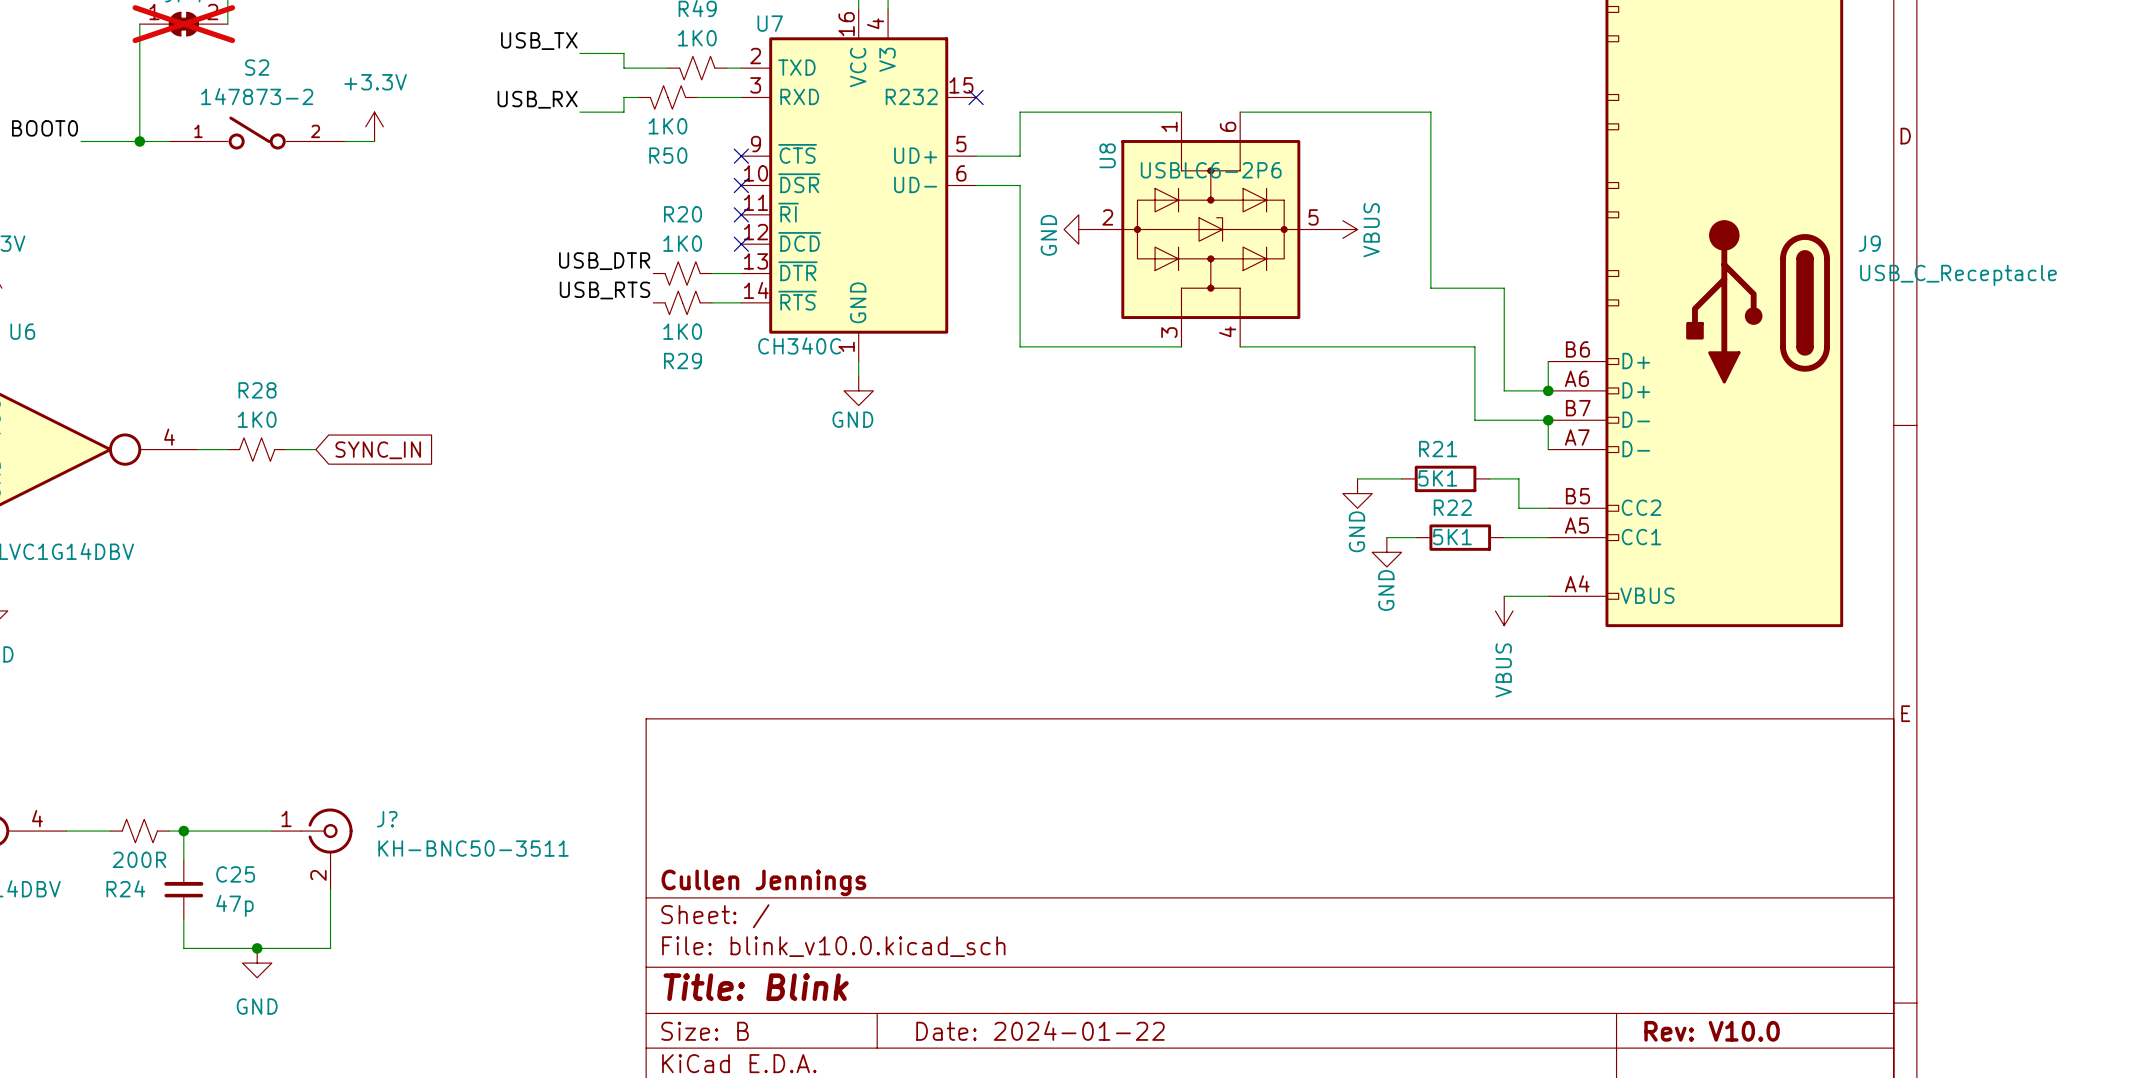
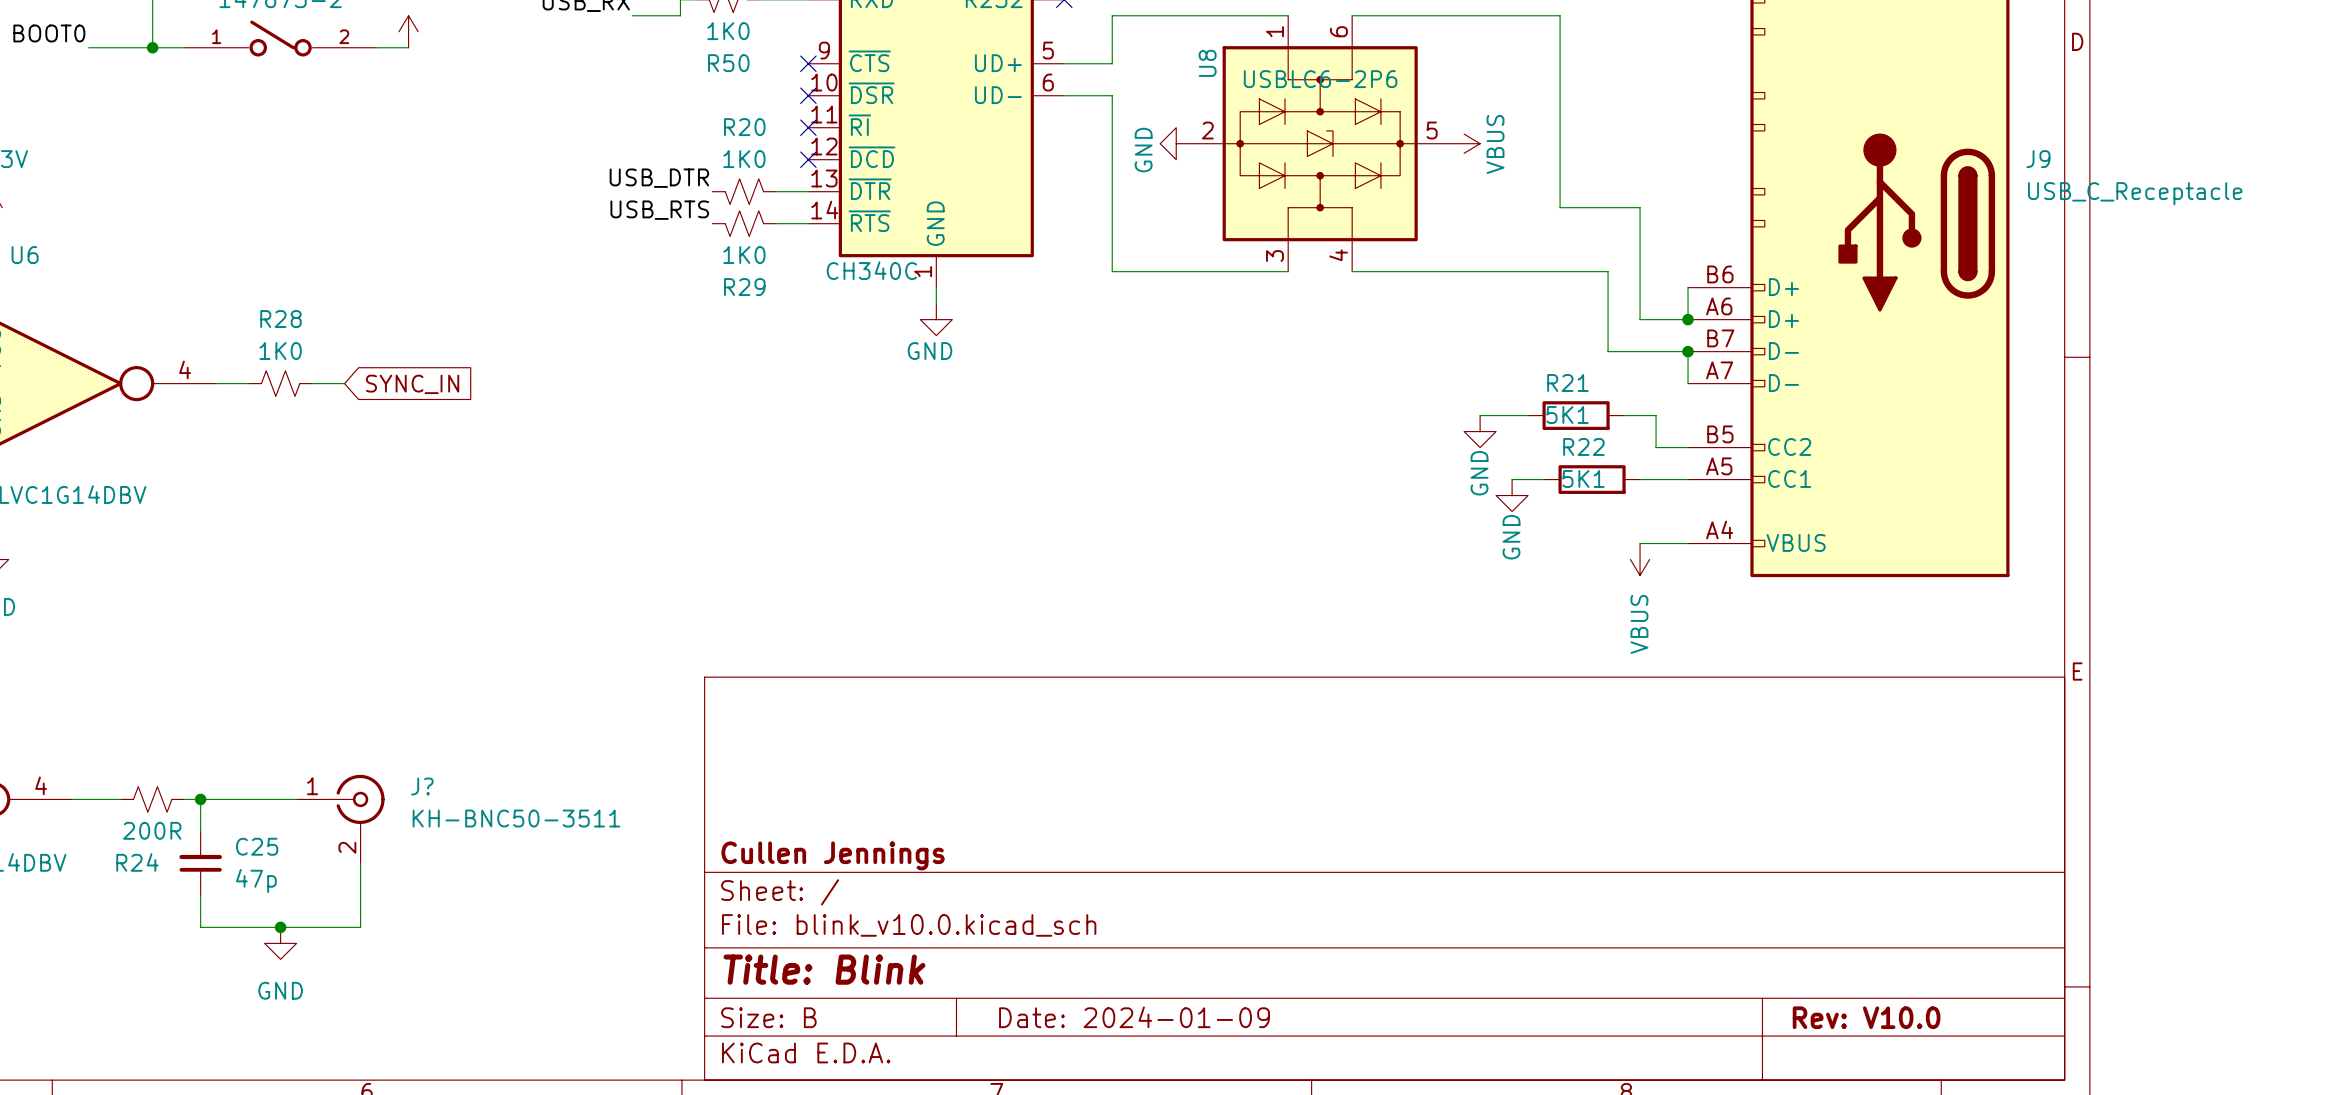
title block: Date: 2024-01-22 (1040, 1030) -> Date: 2024-01-09 (1134, 1017)

